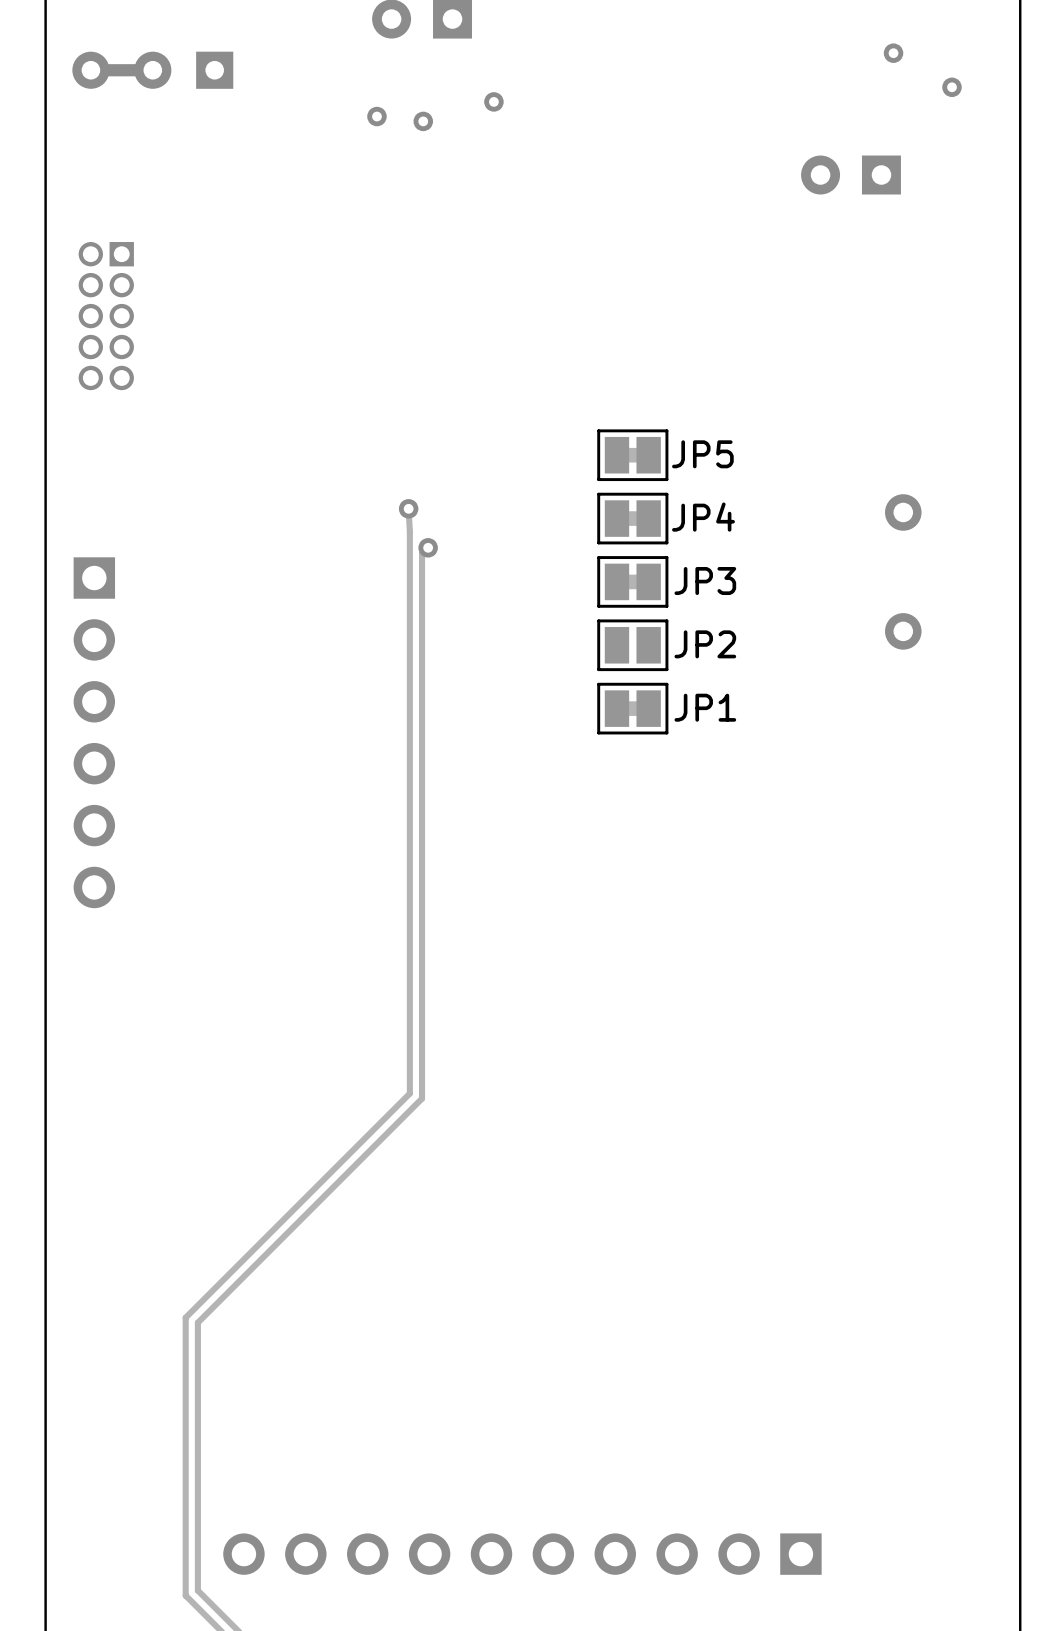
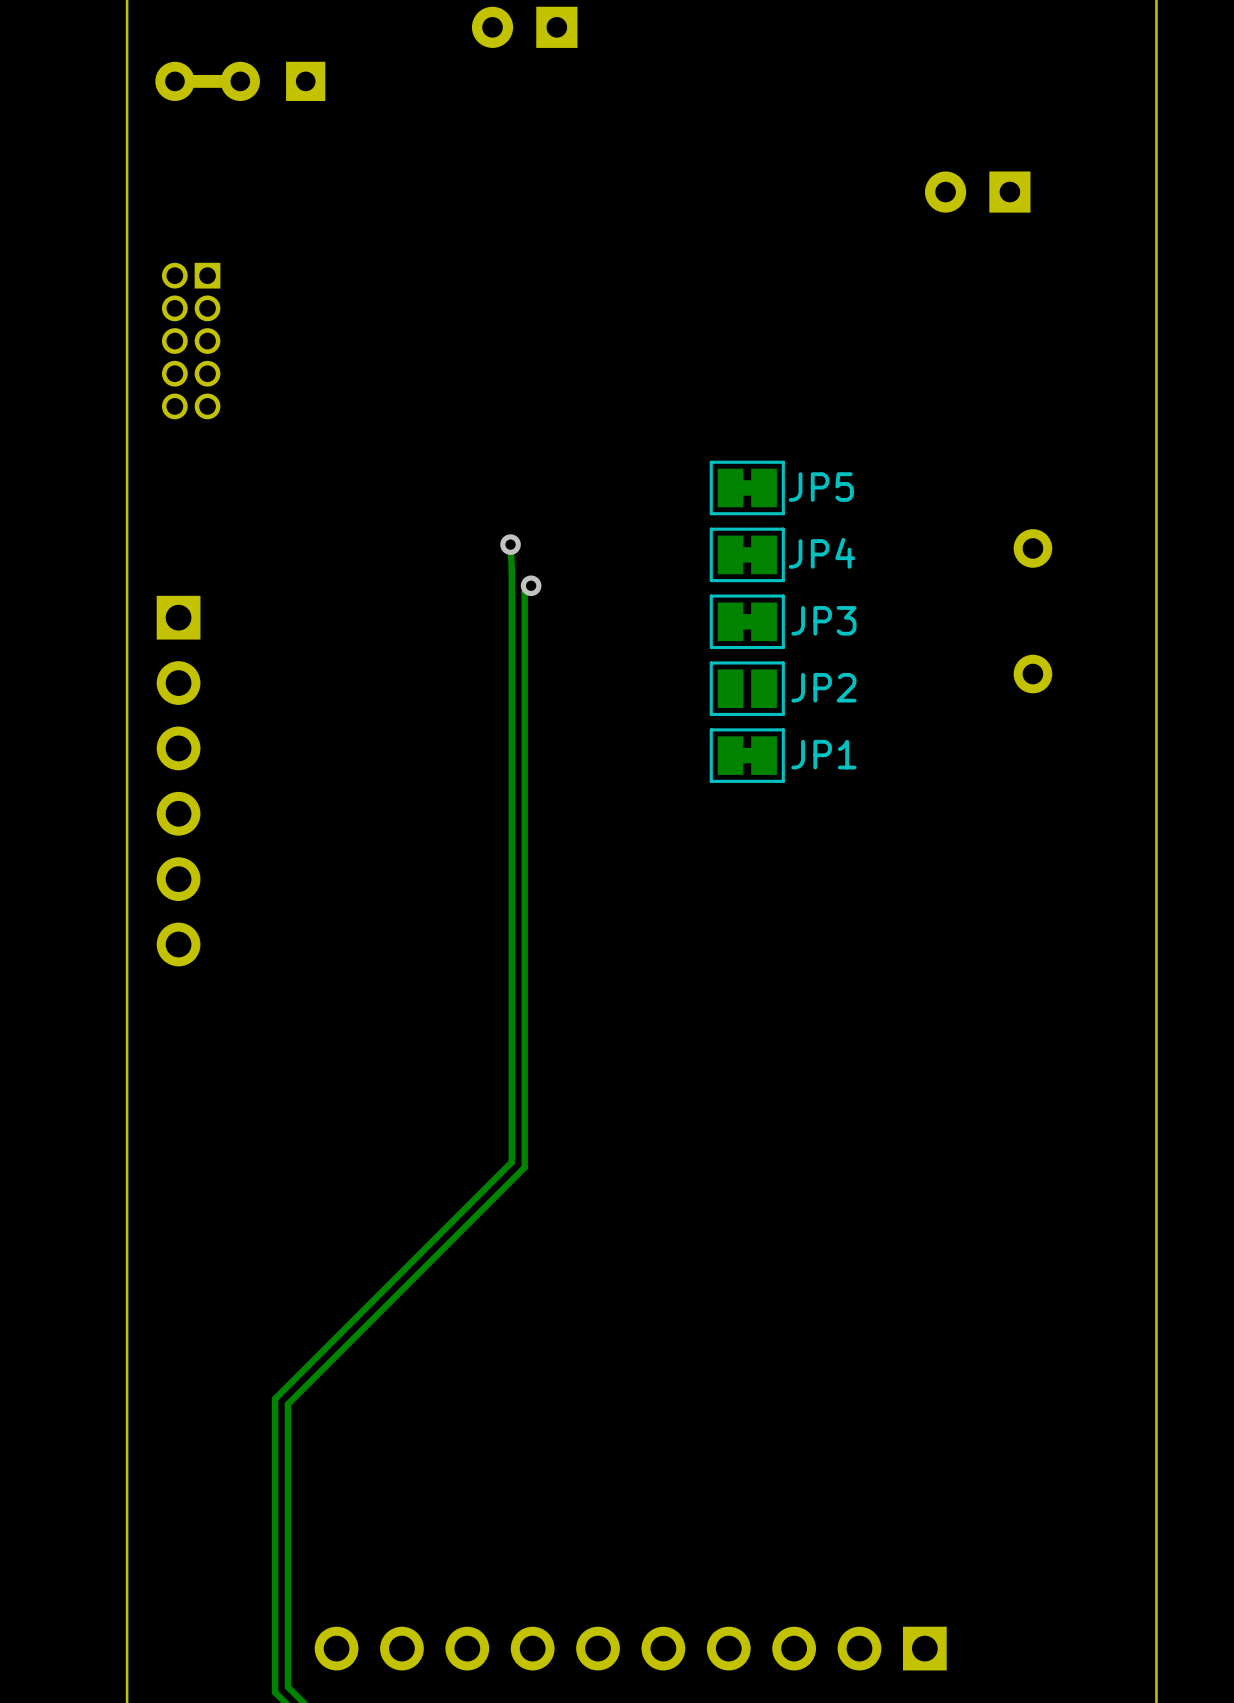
via: (893, 53) -> none
via: (952, 87) -> none
via: (493, 101) -> none
via: (376, 116) -> none
via: (423, 121) -> none

